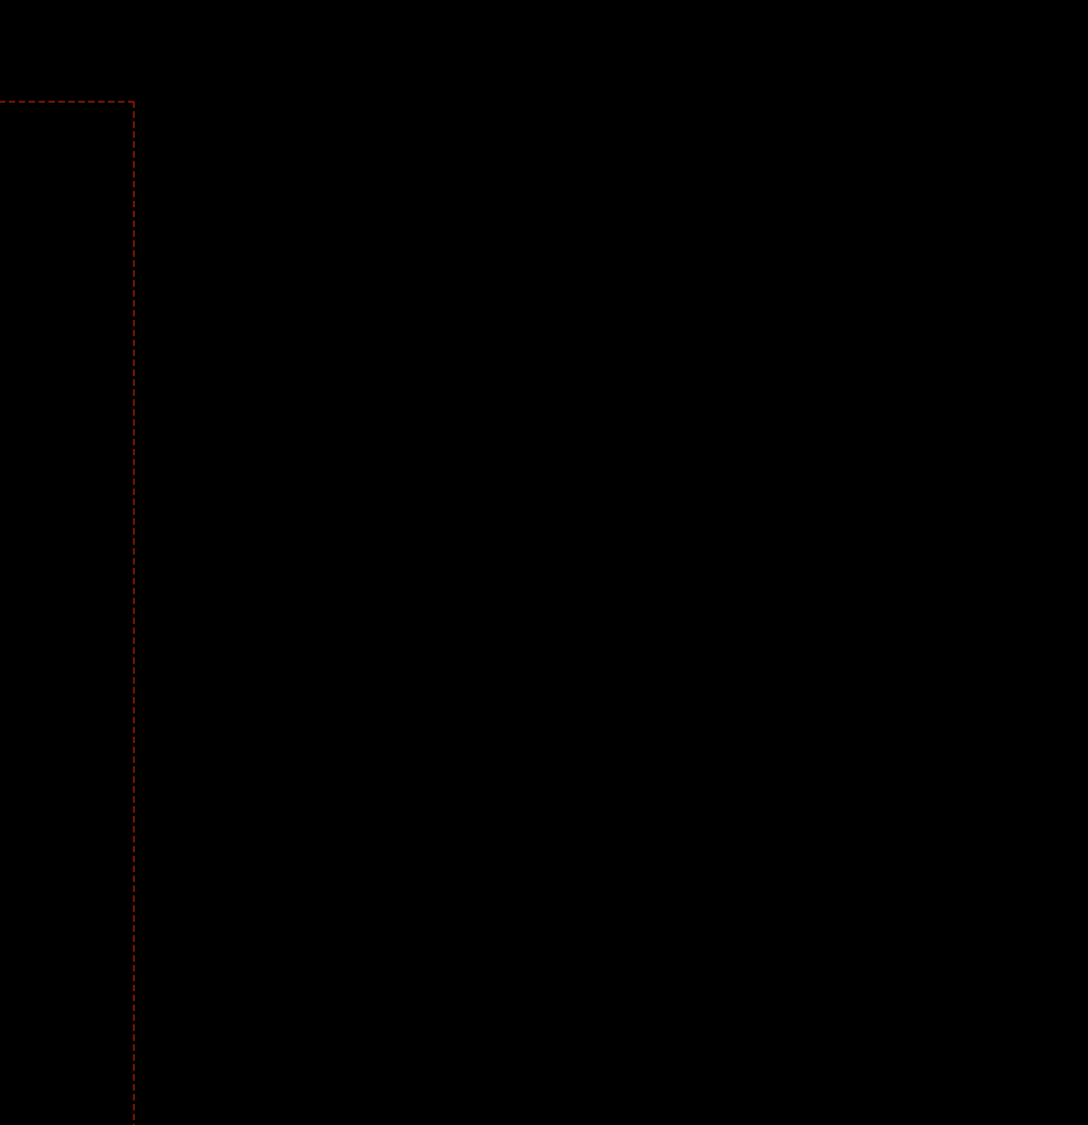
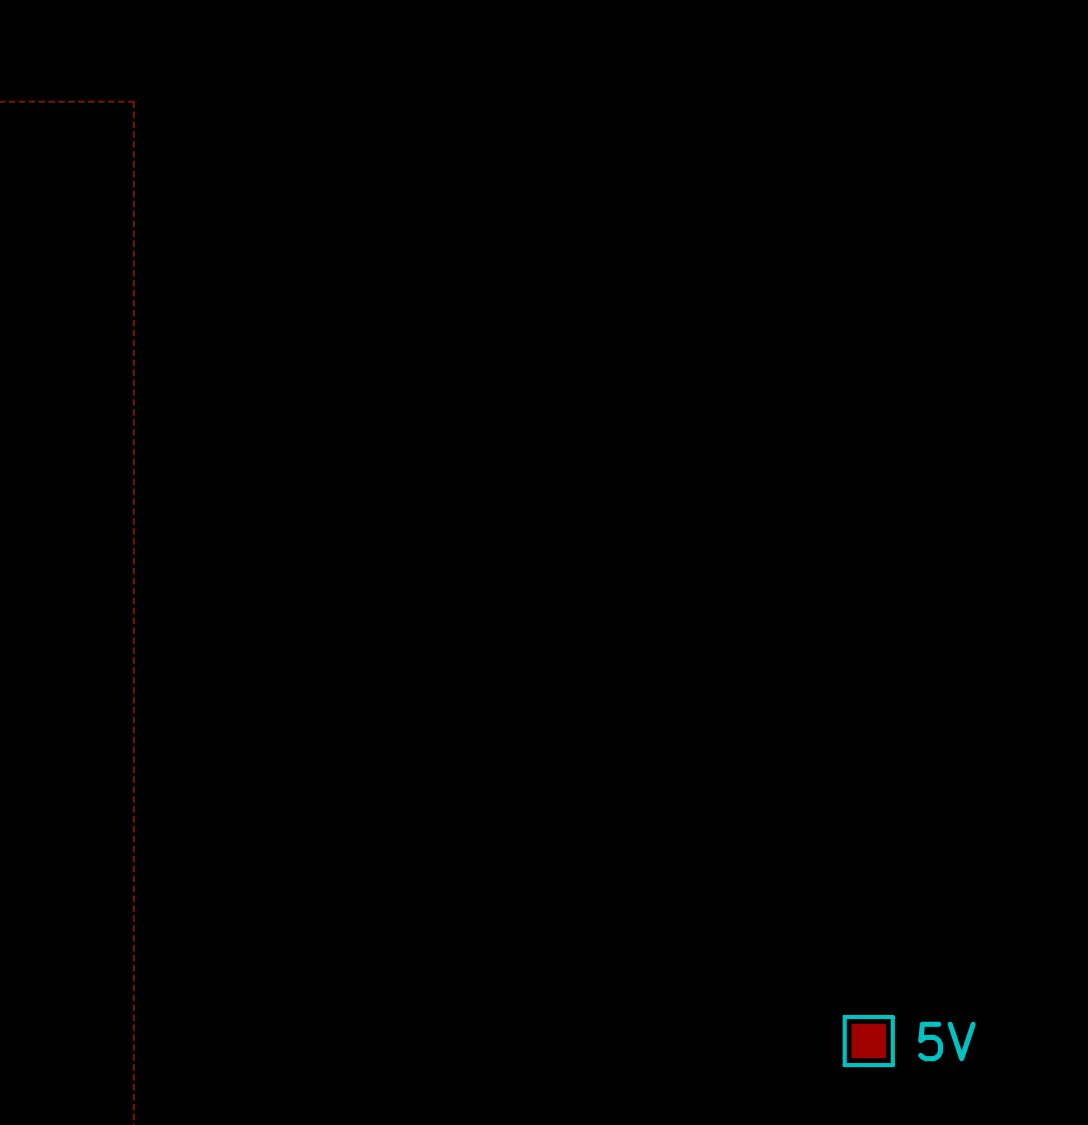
part: none -> 5V (868, 1041)

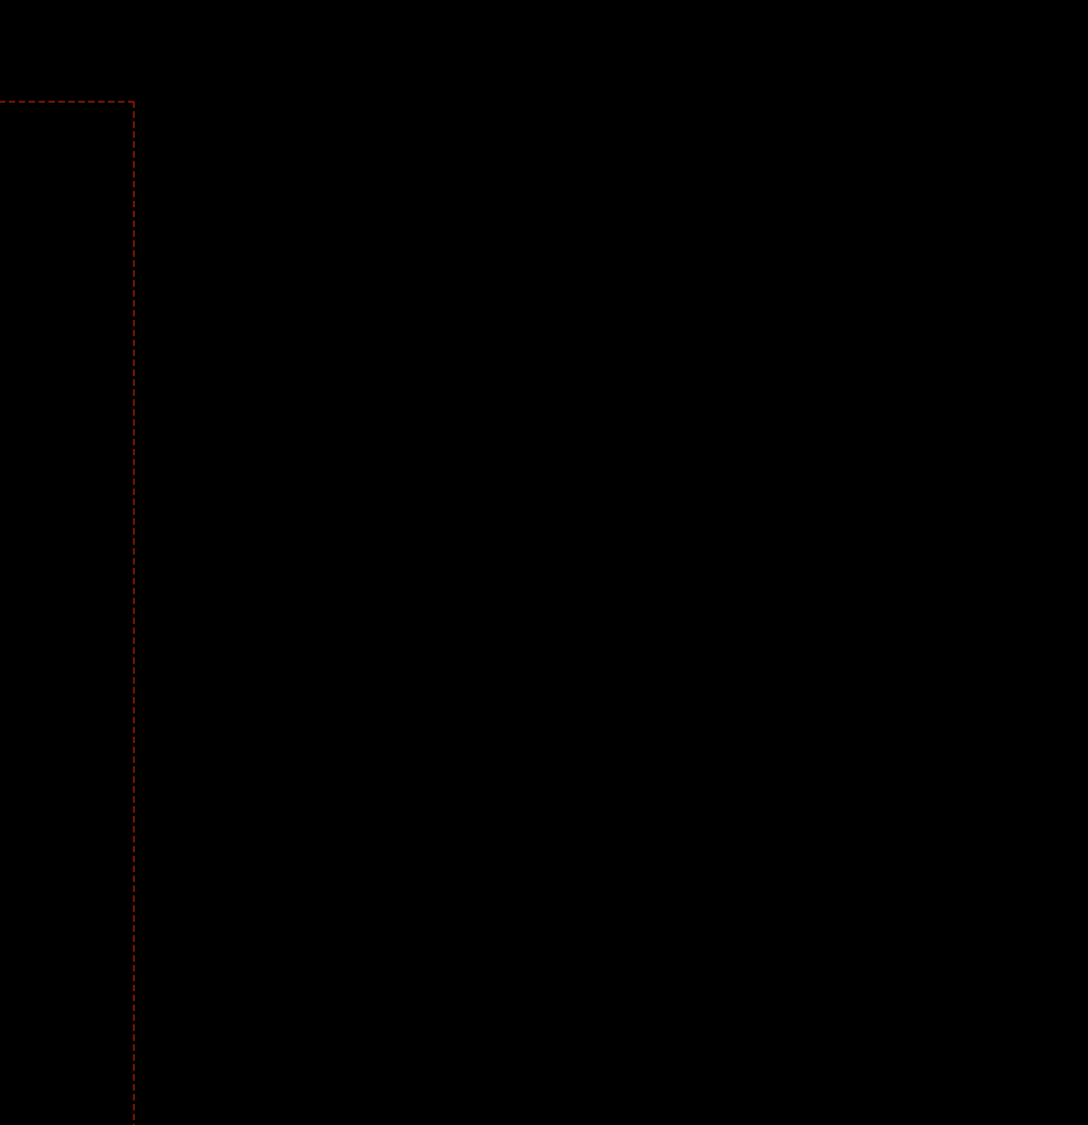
part: 5V (868, 1041) -> none

